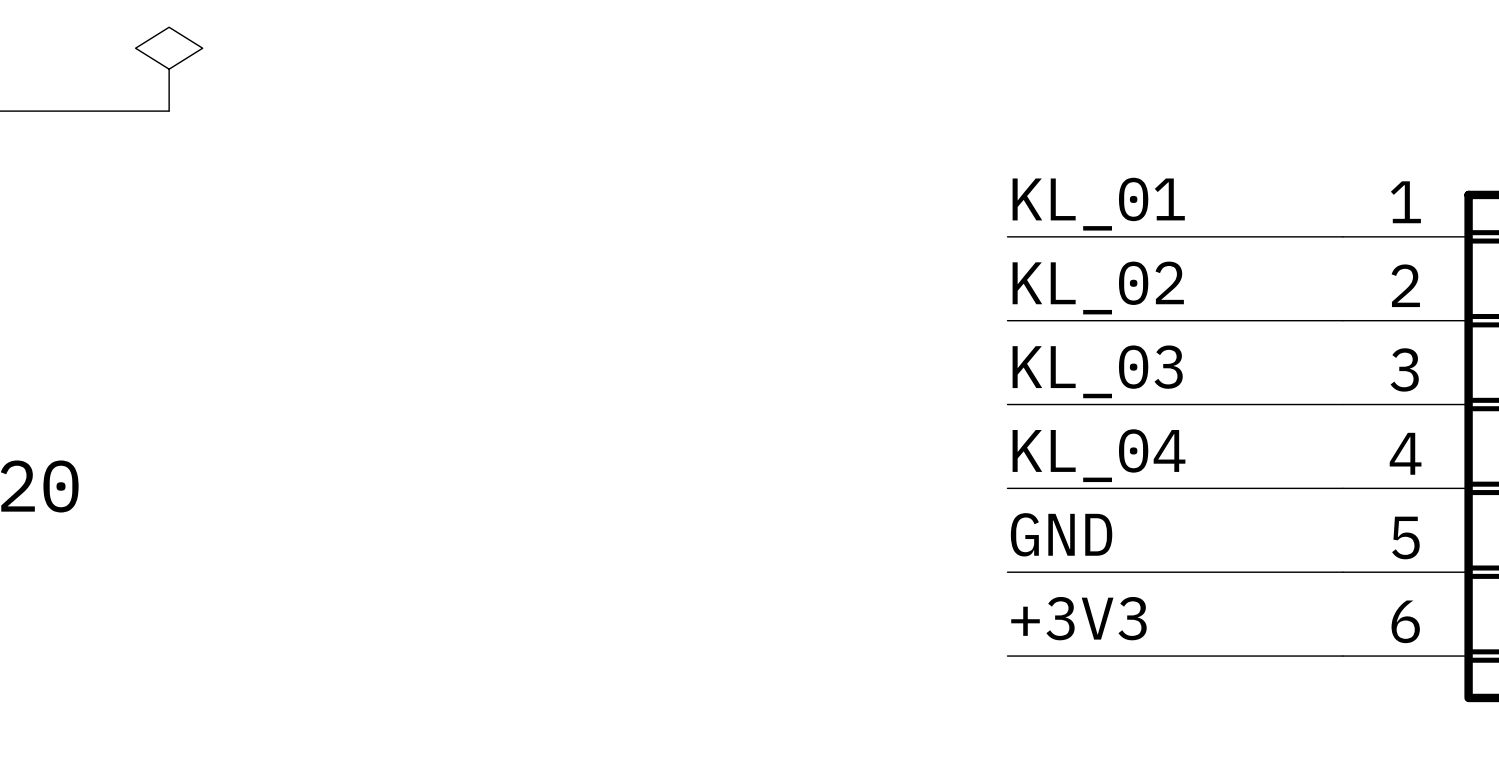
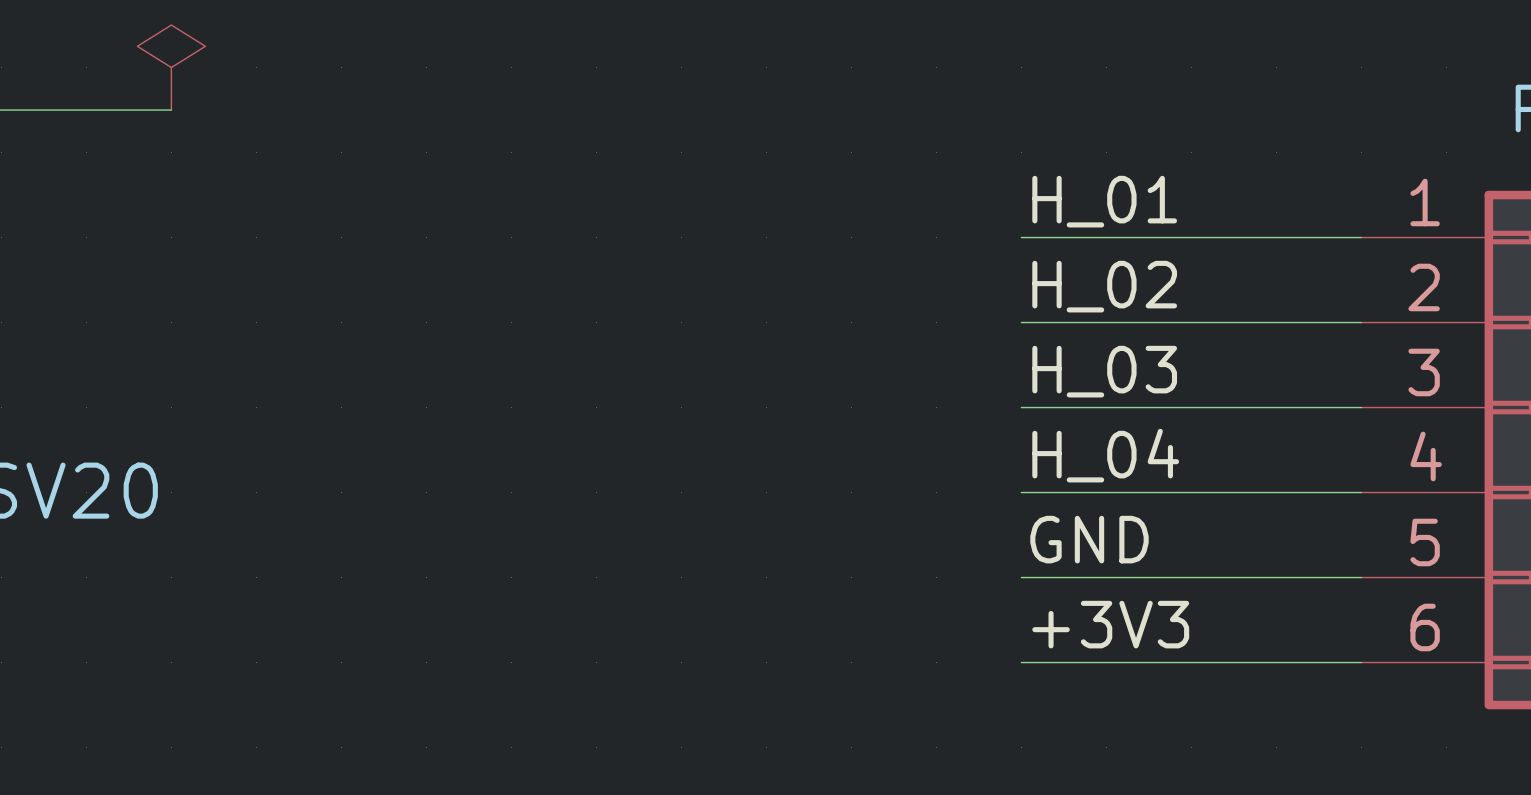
label: KL_01 (1098, 204) -> H_01 (1104, 201)
label: KL_02 (1098, 288) -> H_02 (1104, 286)
label: KL_03 (1097, 371) -> H_03 (1104, 371)
label: KL_04 (1098, 455) -> H_04 (1105, 455)

